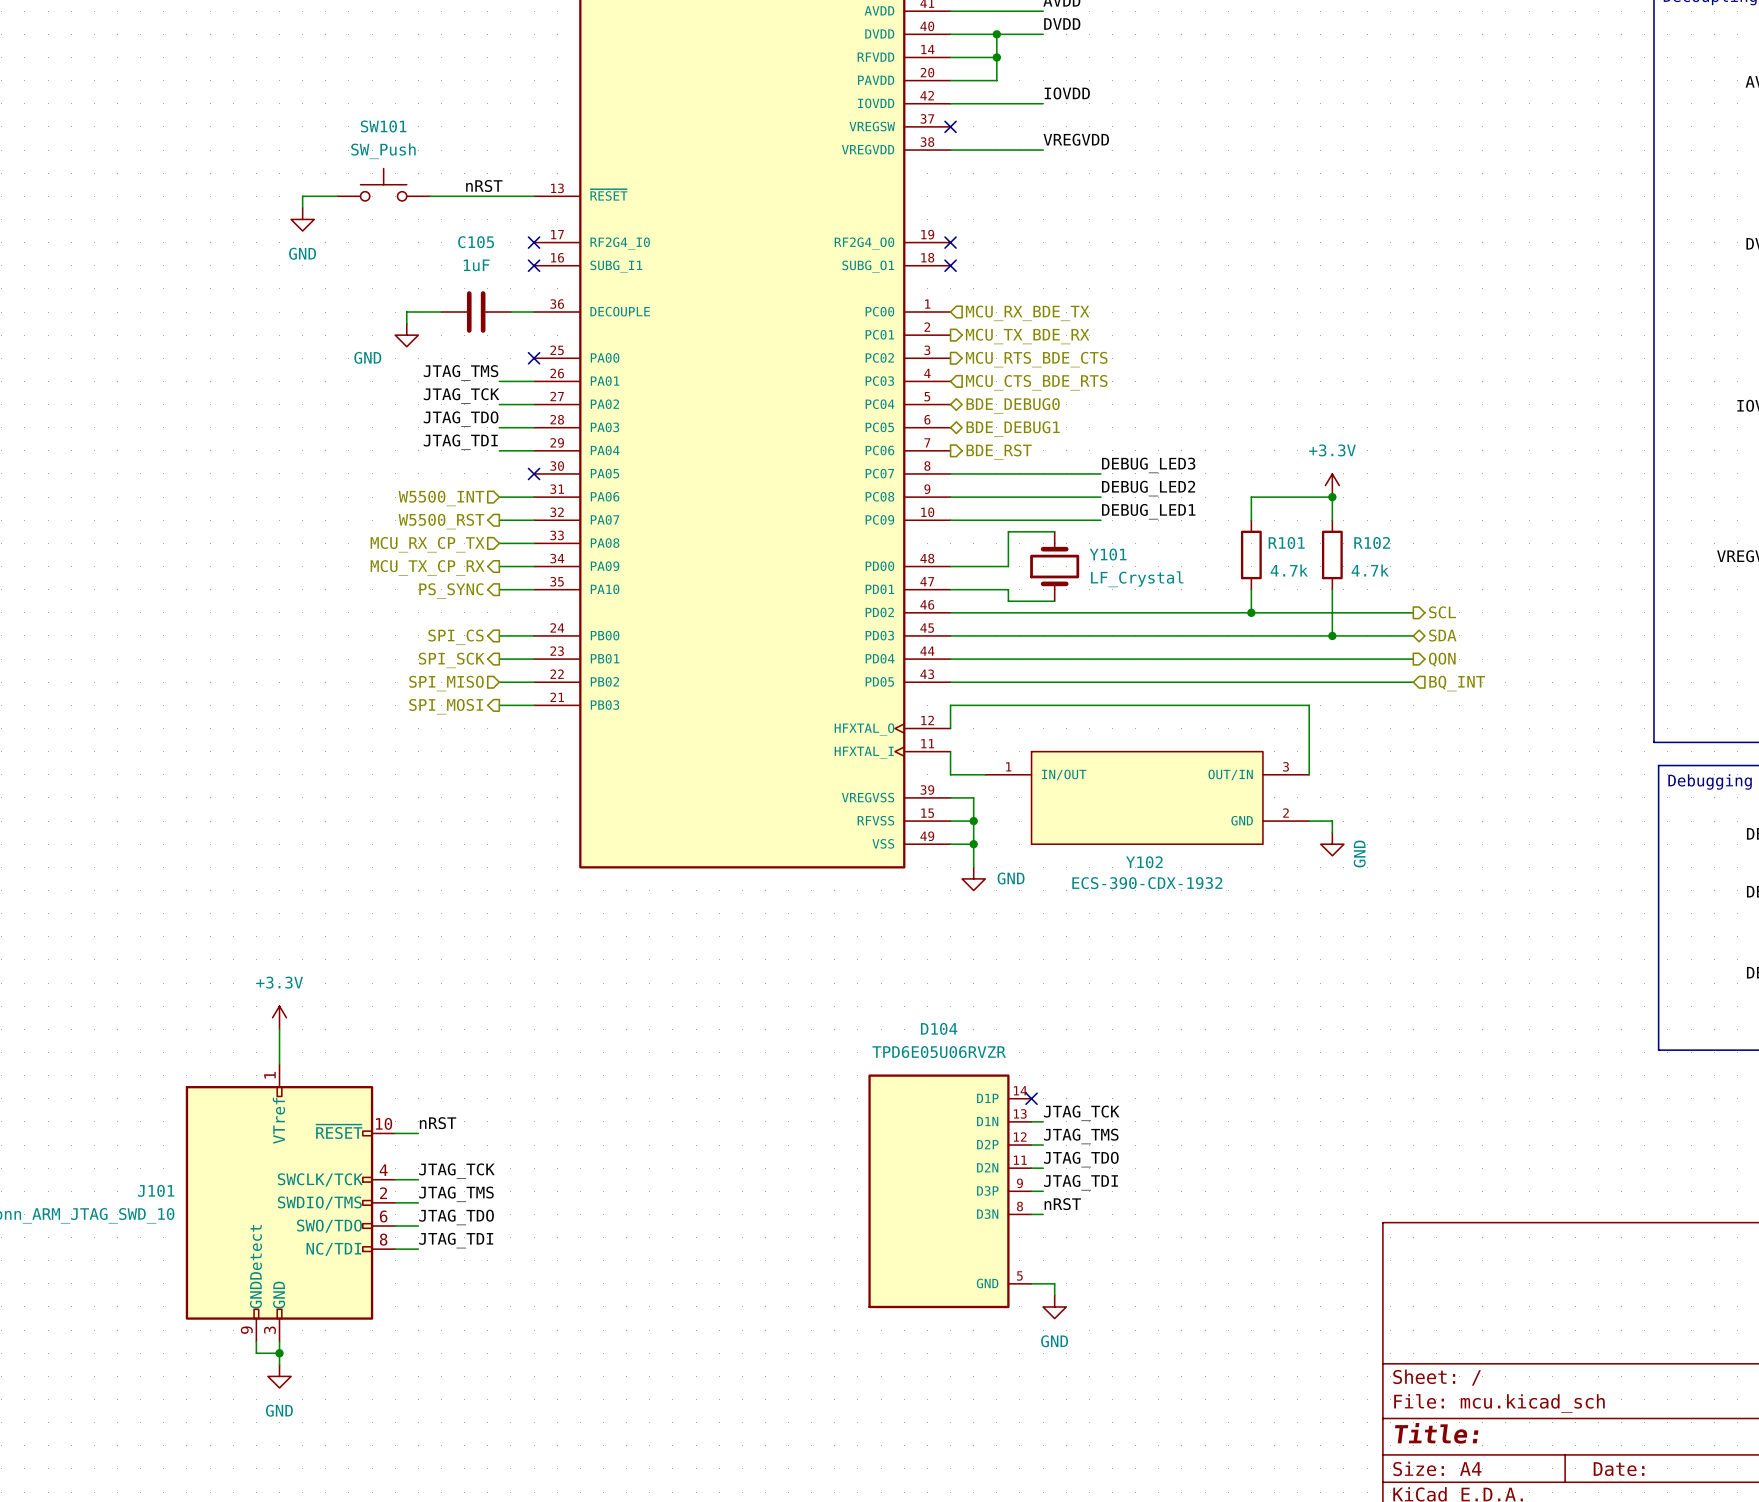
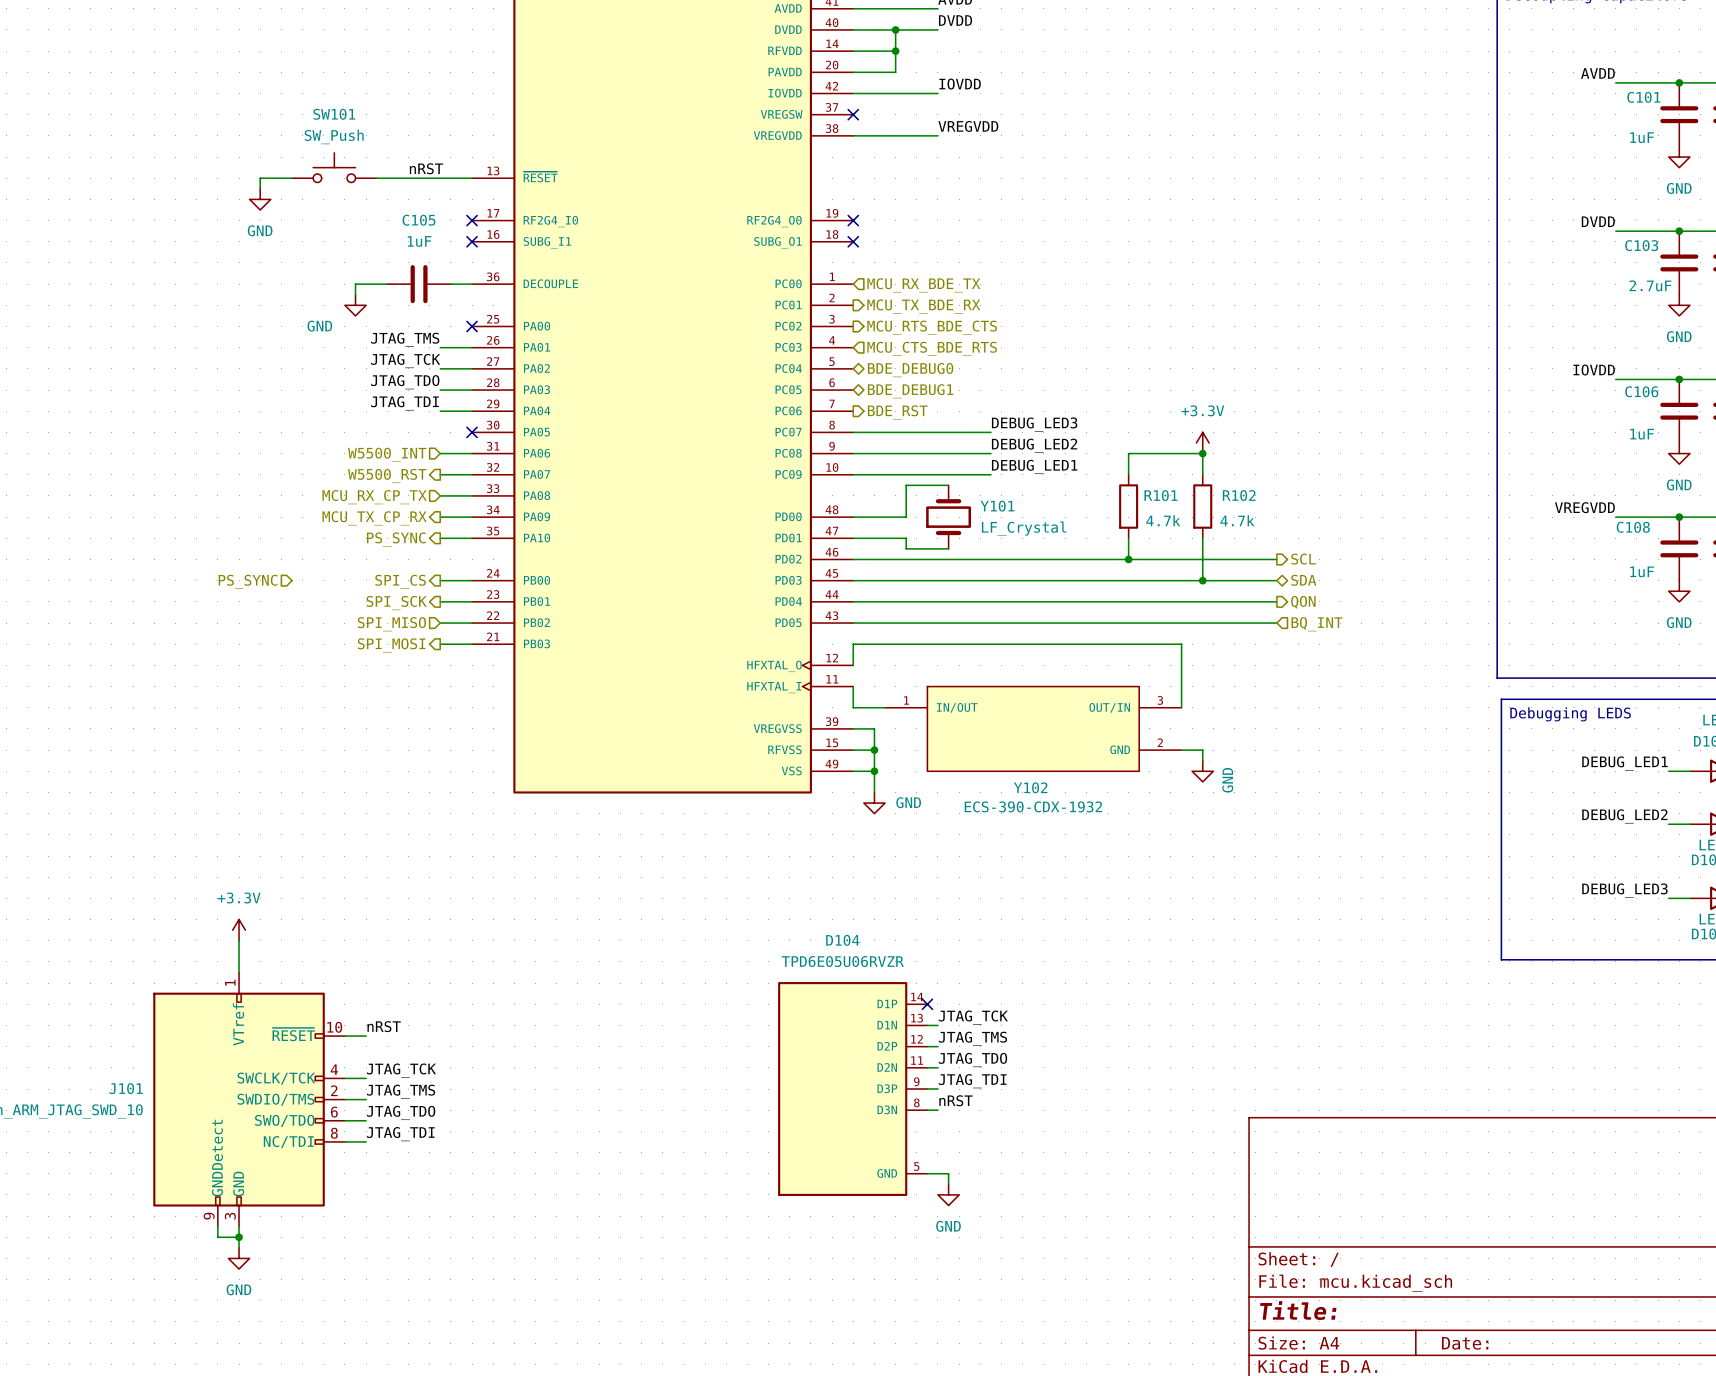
hierarchical label: none -> PS_SYNC (248, 581)

